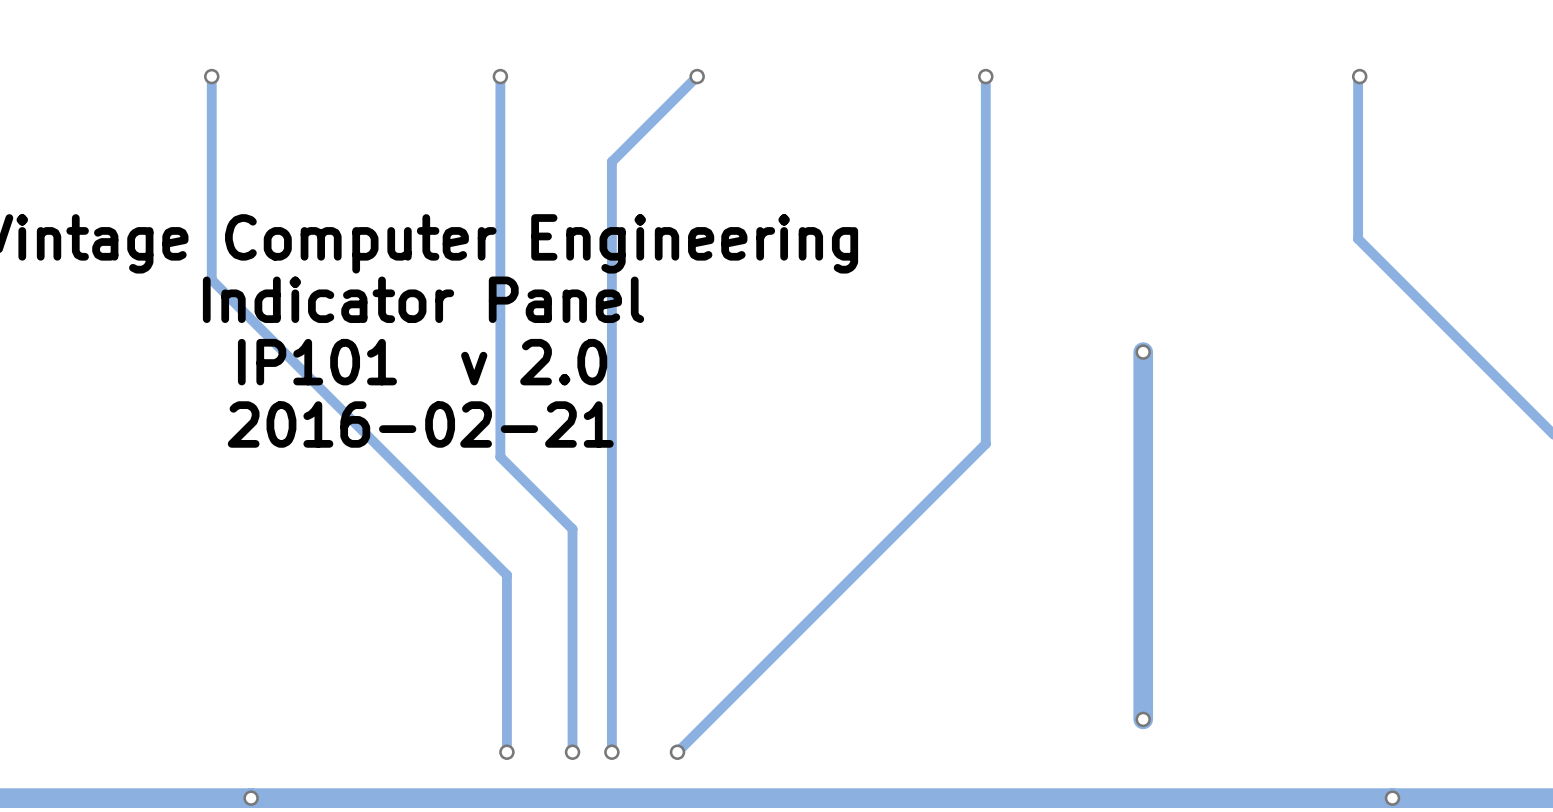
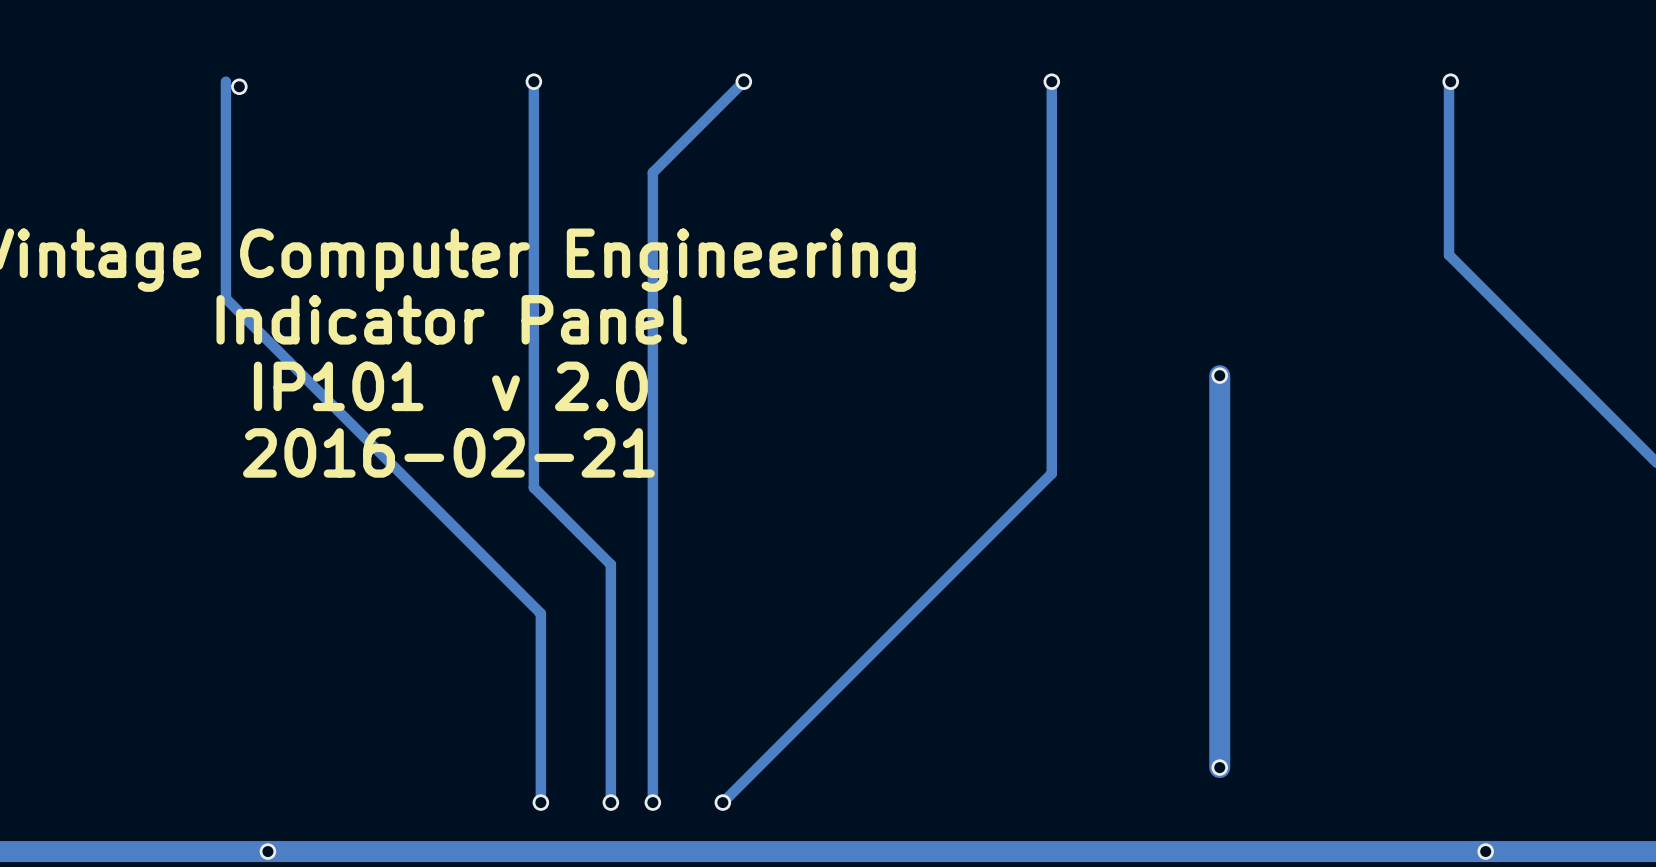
via position: (211, 76) -> (239, 86)

